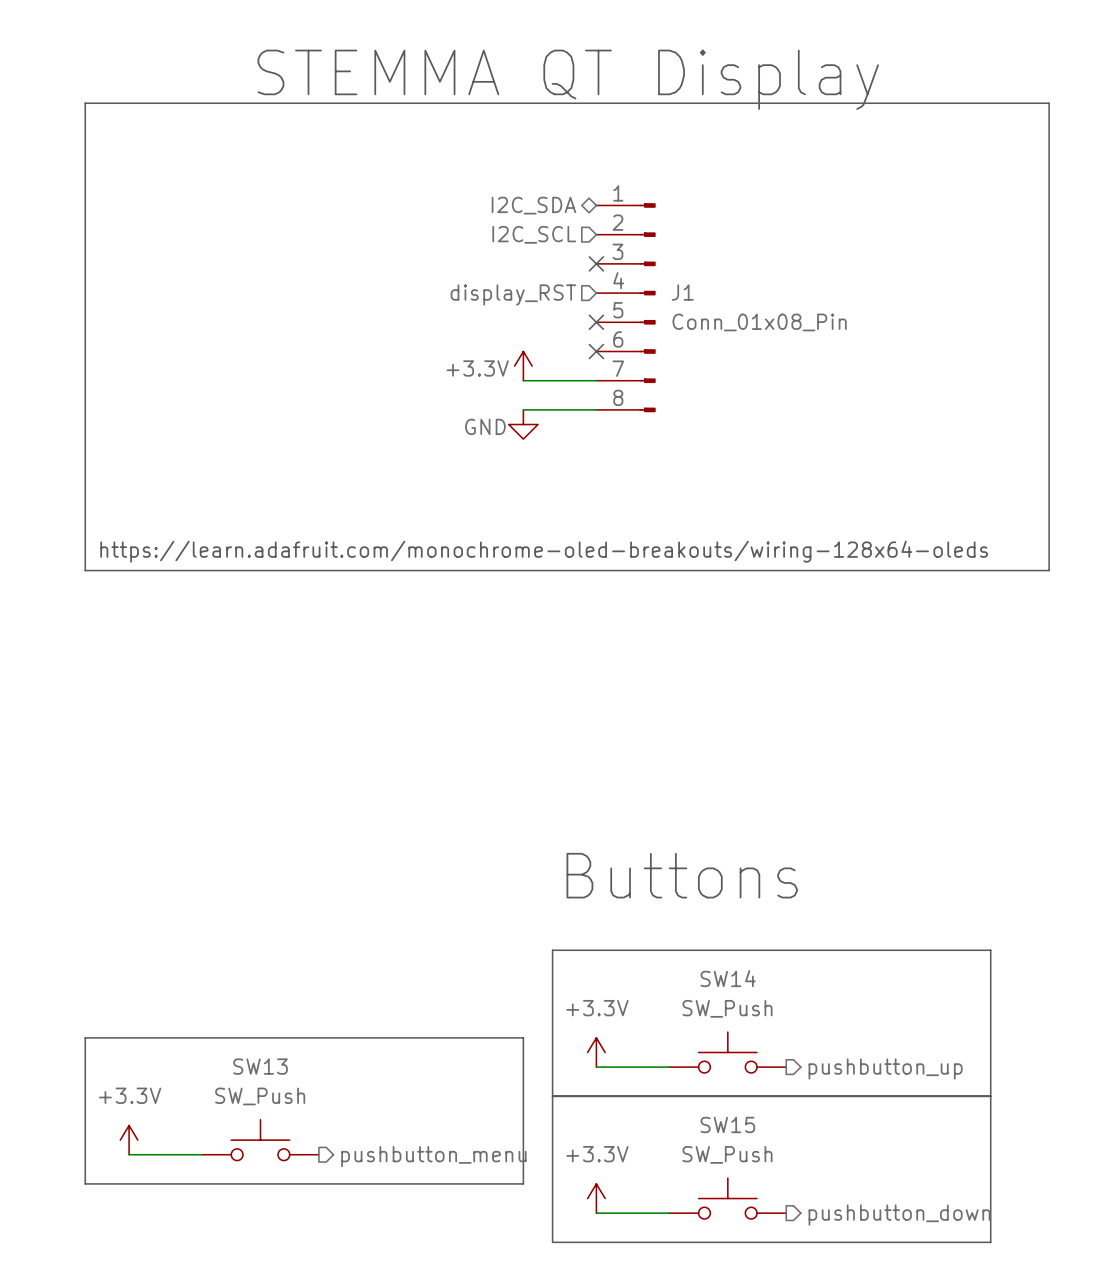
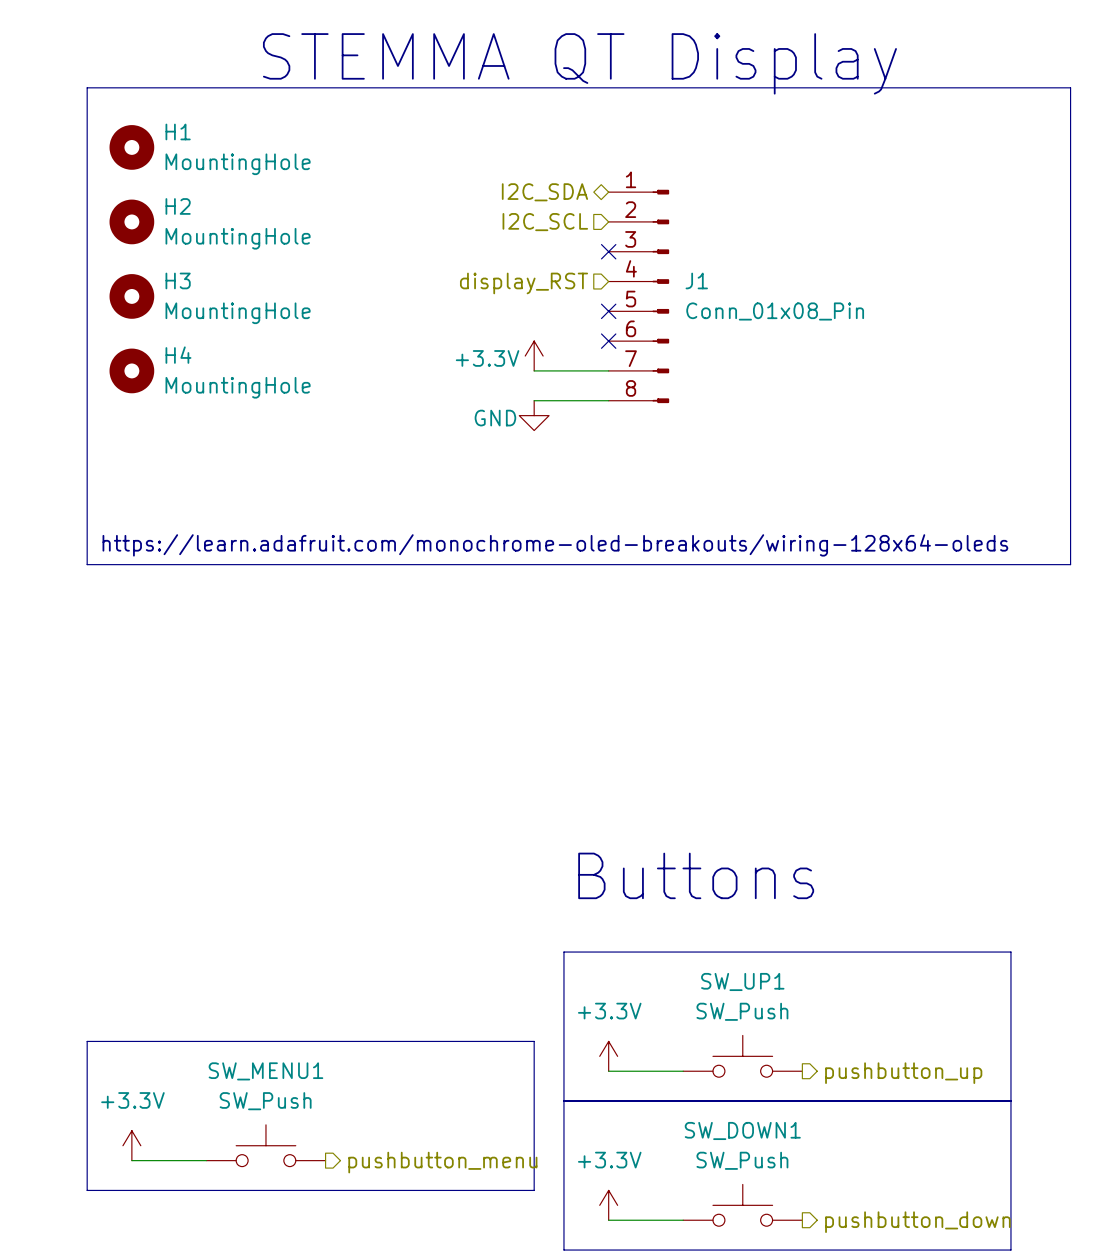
H1: none -> MountingHole (131, 147)
H2: none -> MountingHole (131, 221)
H3: none -> MountingHole (131, 296)
H4: none -> MountingHole (131, 370)
SW14 name: SW14 (728, 978) -> SW_UP1 (742, 981)
SW13 name: SW13 (260, 1066) -> SW_MENU1 (265, 1071)
SW15 name: SW15 (727, 1124) -> SW_DOWN1 (742, 1130)

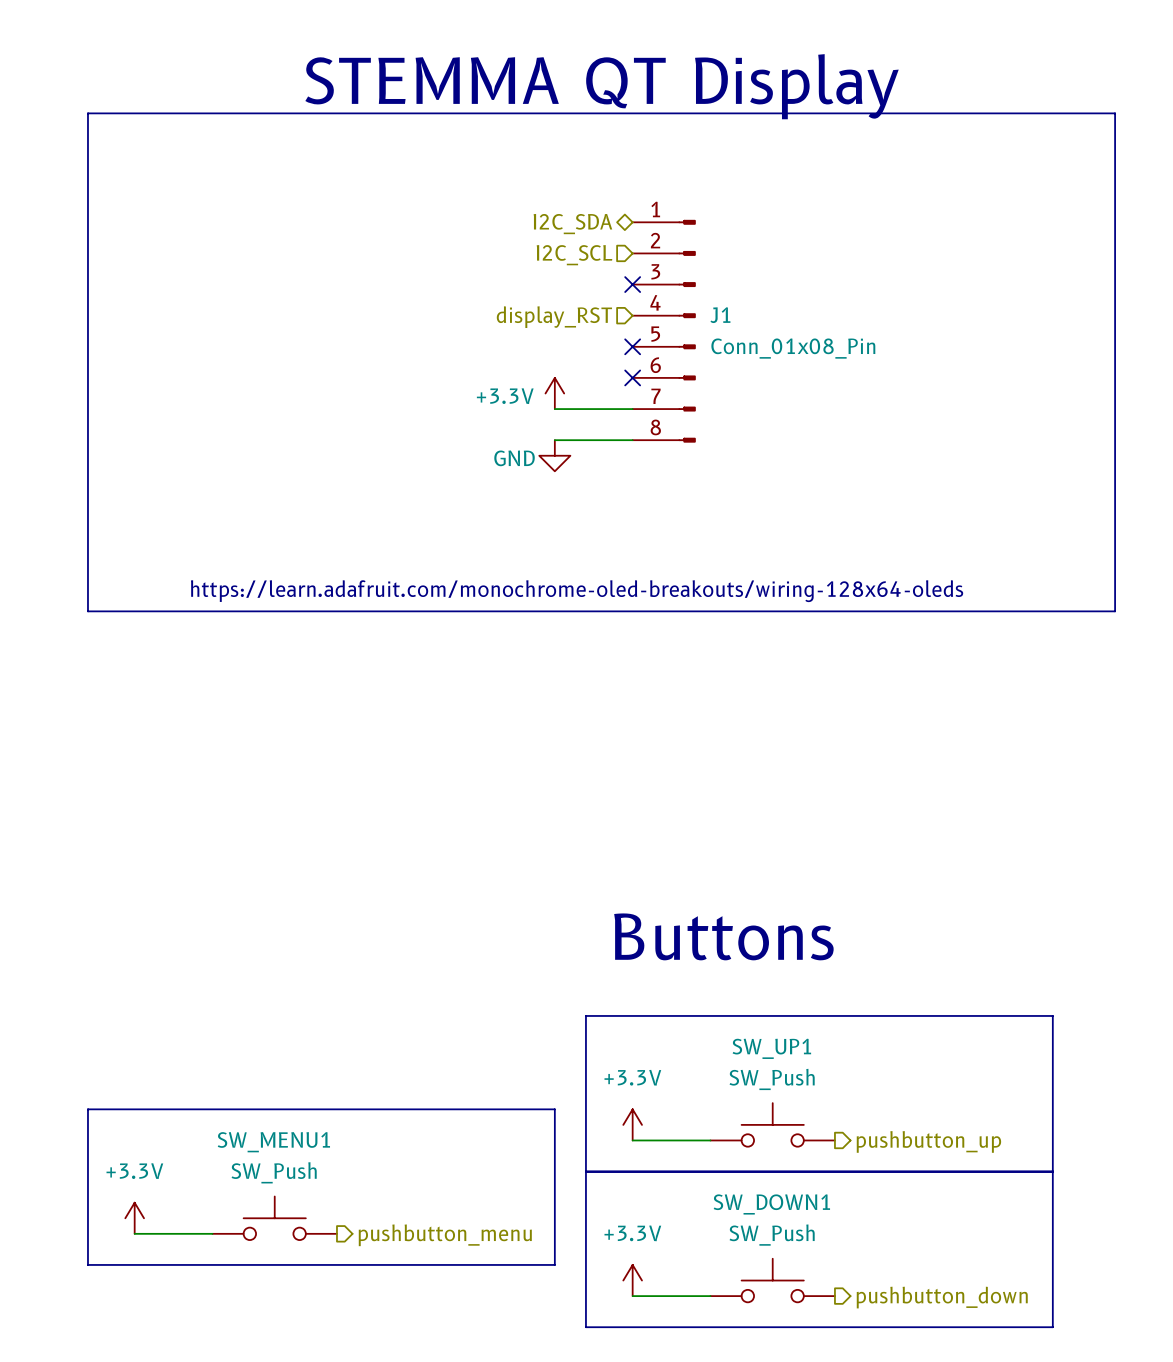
H1: MountingHole (131, 147) -> none
H2: MountingHole (131, 221) -> none
H3: MountingHole (131, 296) -> none
H4: MountingHole (131, 370) -> none

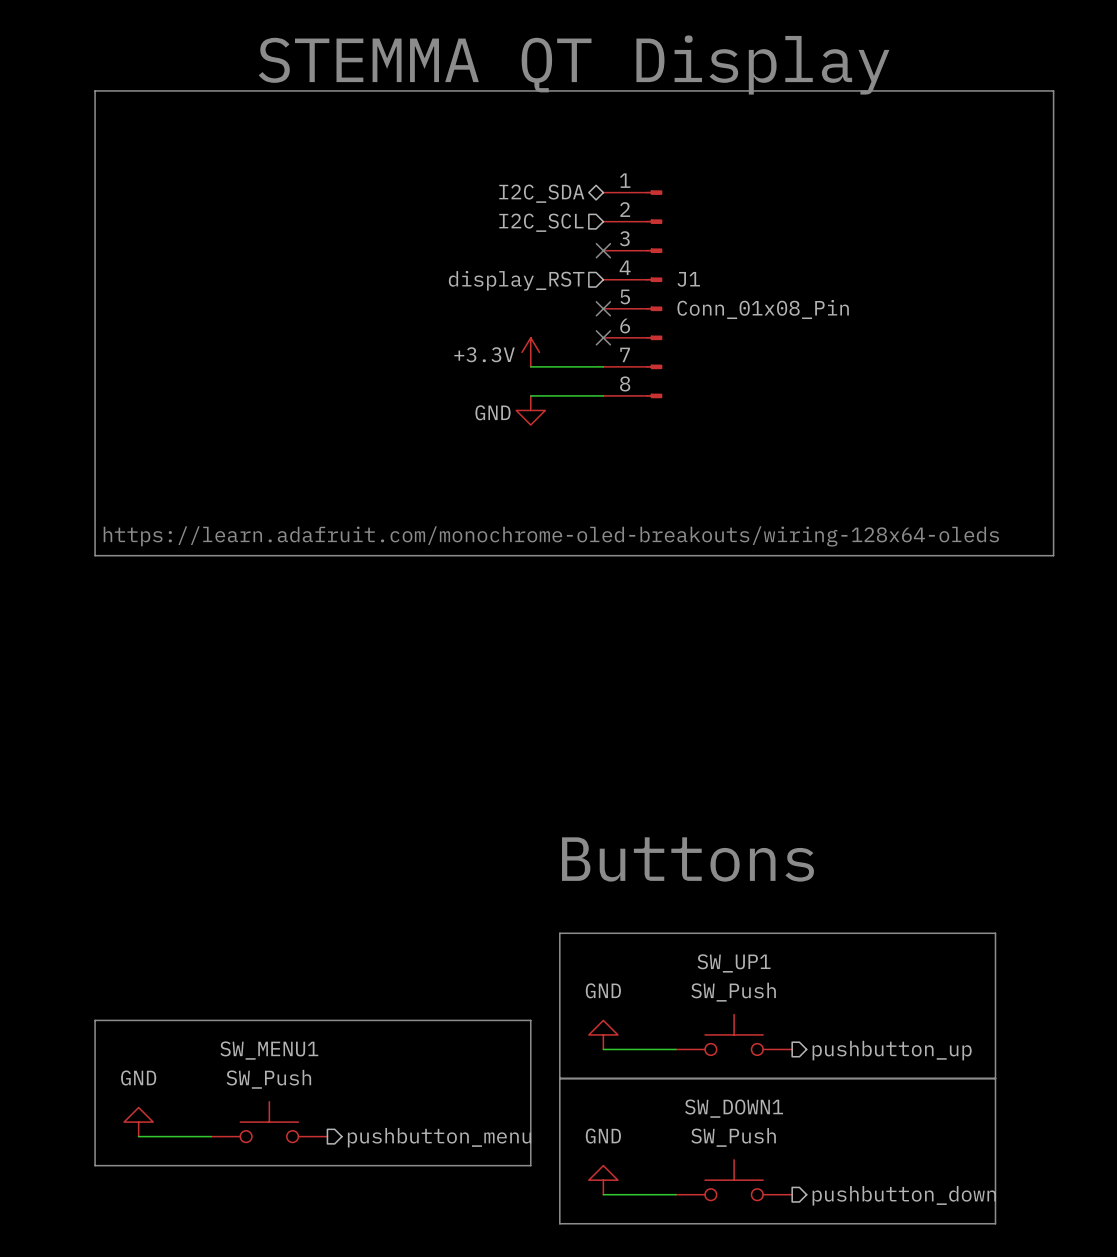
power symbol: +3.3V (632, 1124) -> GND (603, 1034)
power symbol: +3.3V (134, 1218) -> GND (138, 1122)
power symbol: +3.3V (632, 1280) -> GND (603, 1180)

